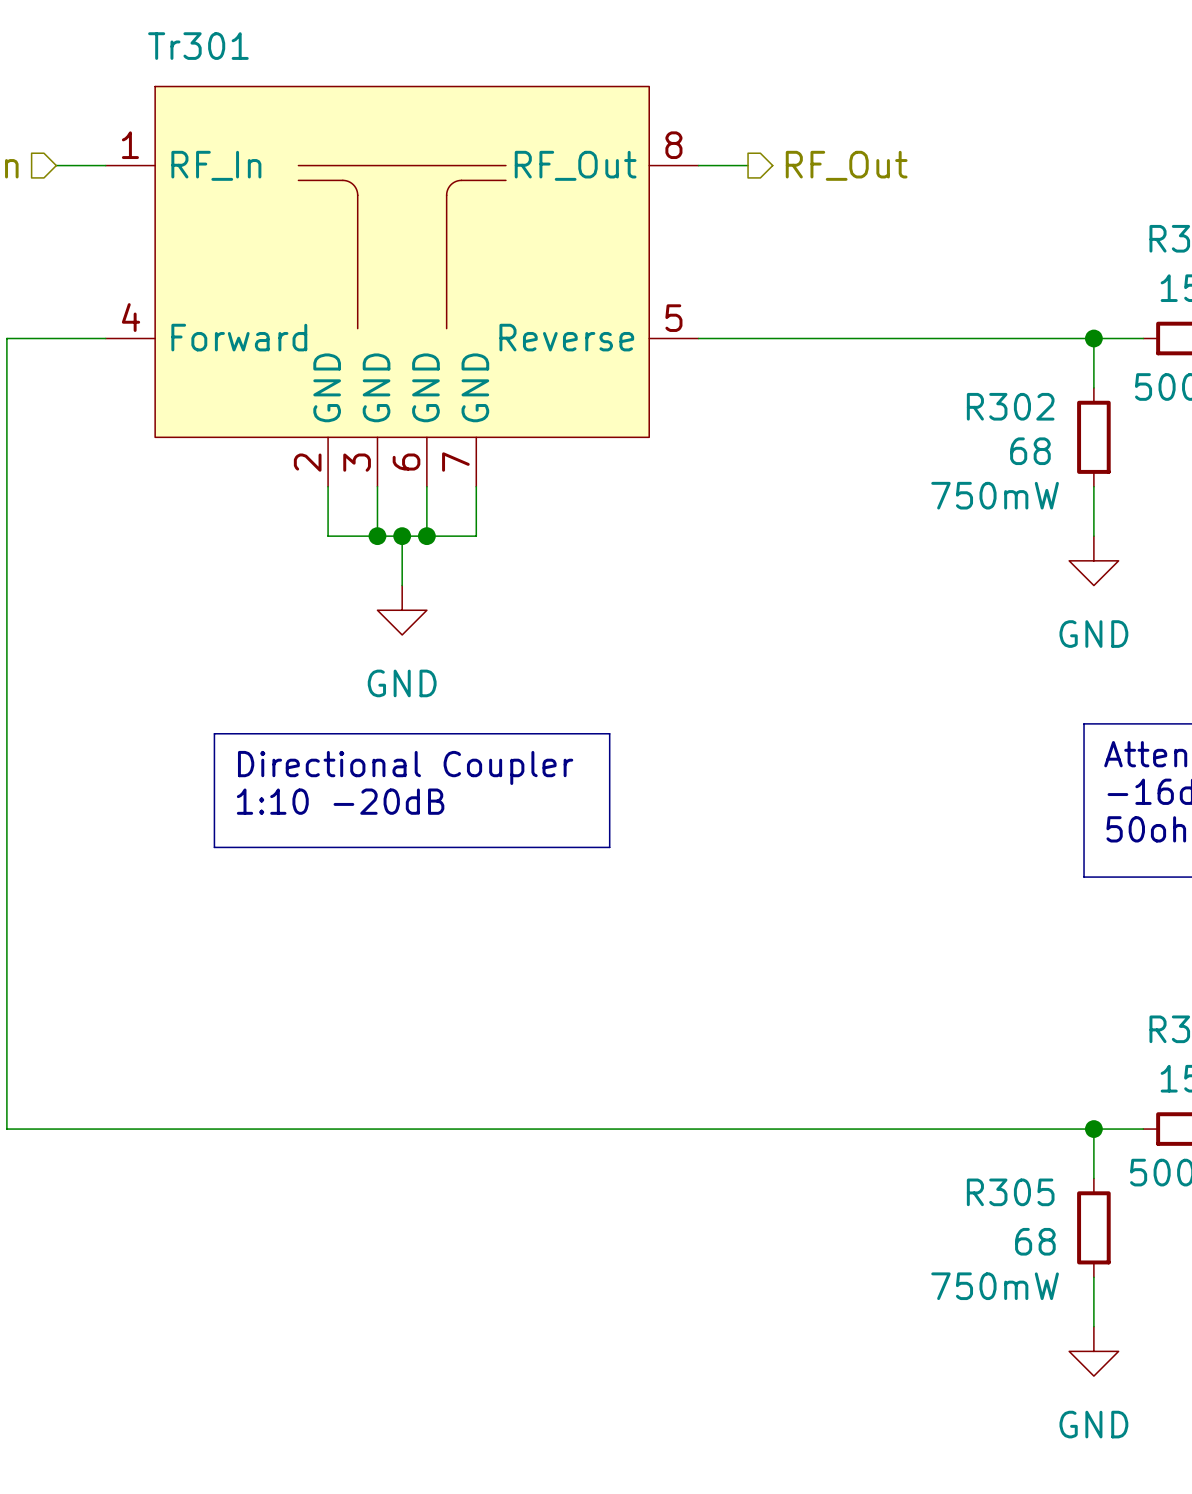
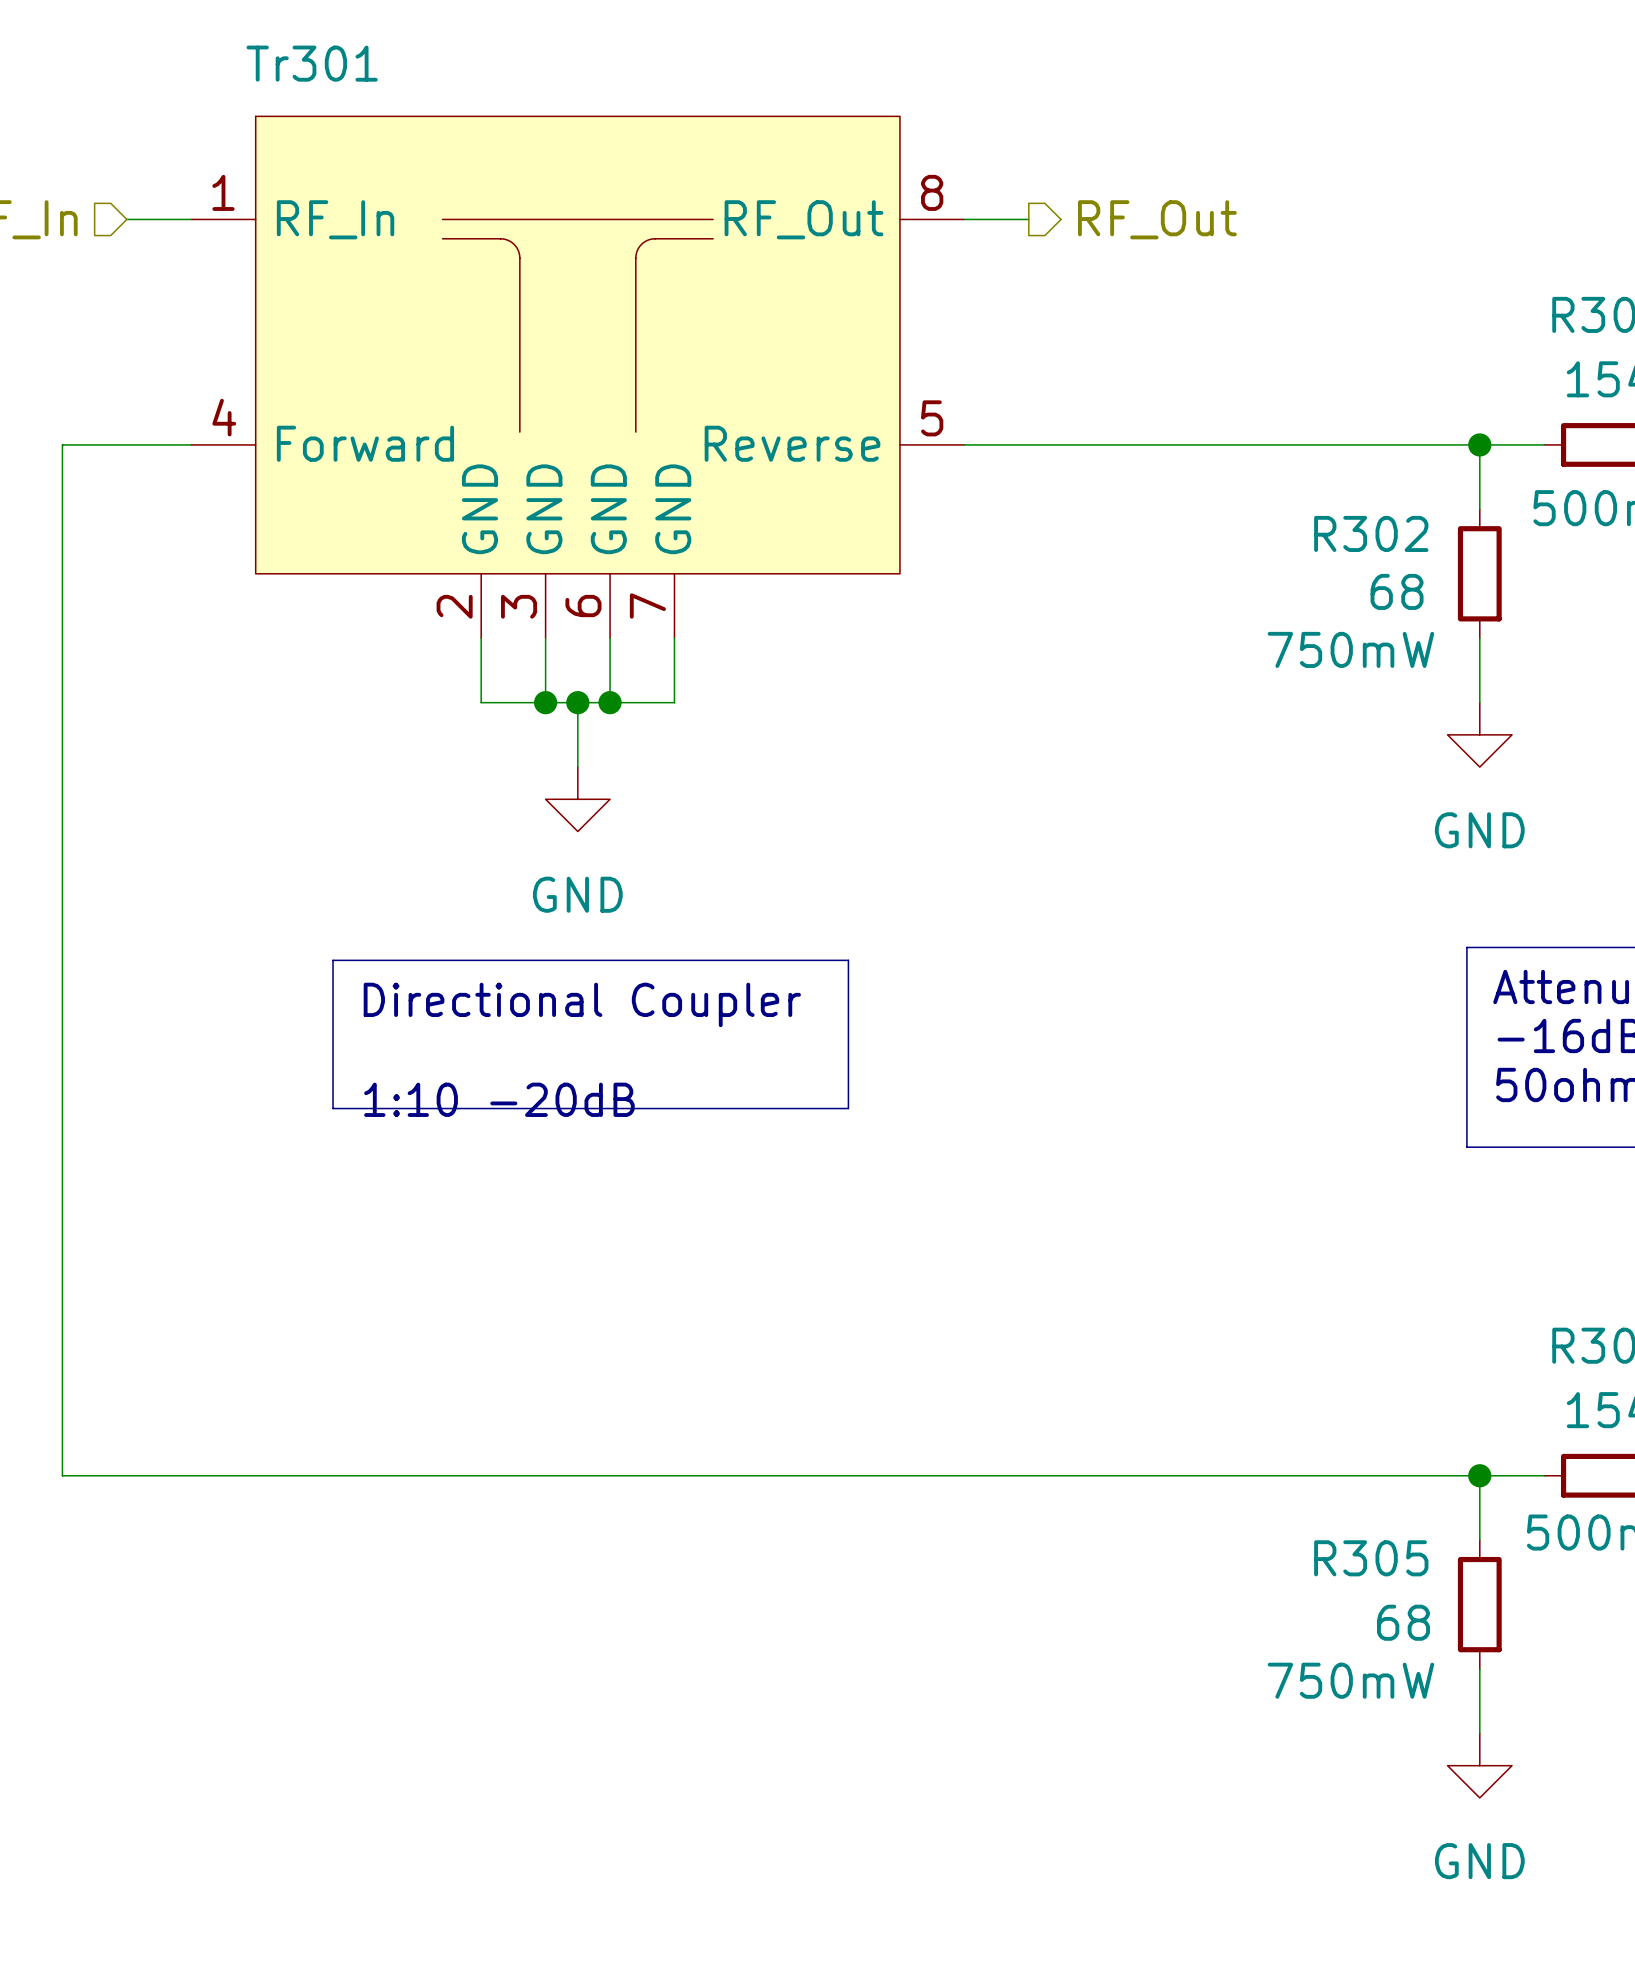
text position: 1:10 -20dB (340, 801) -> 1:10 -20dB (499, 1099)

